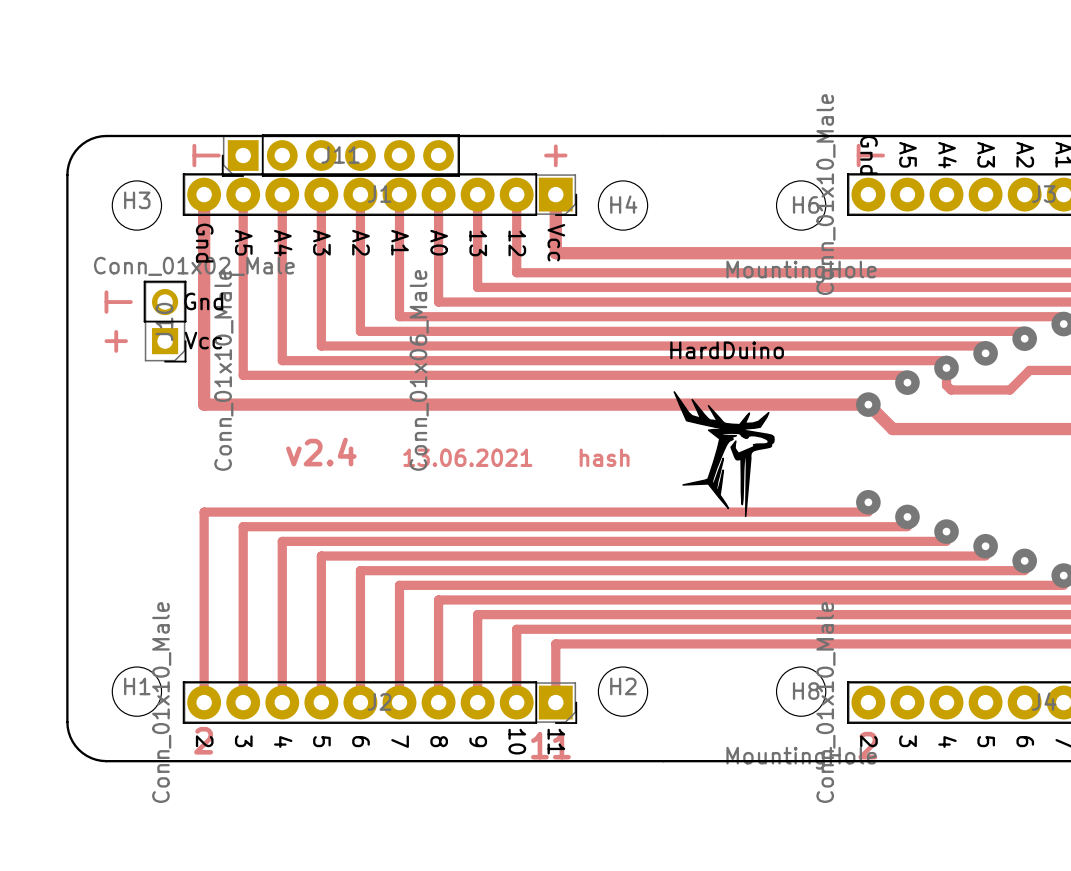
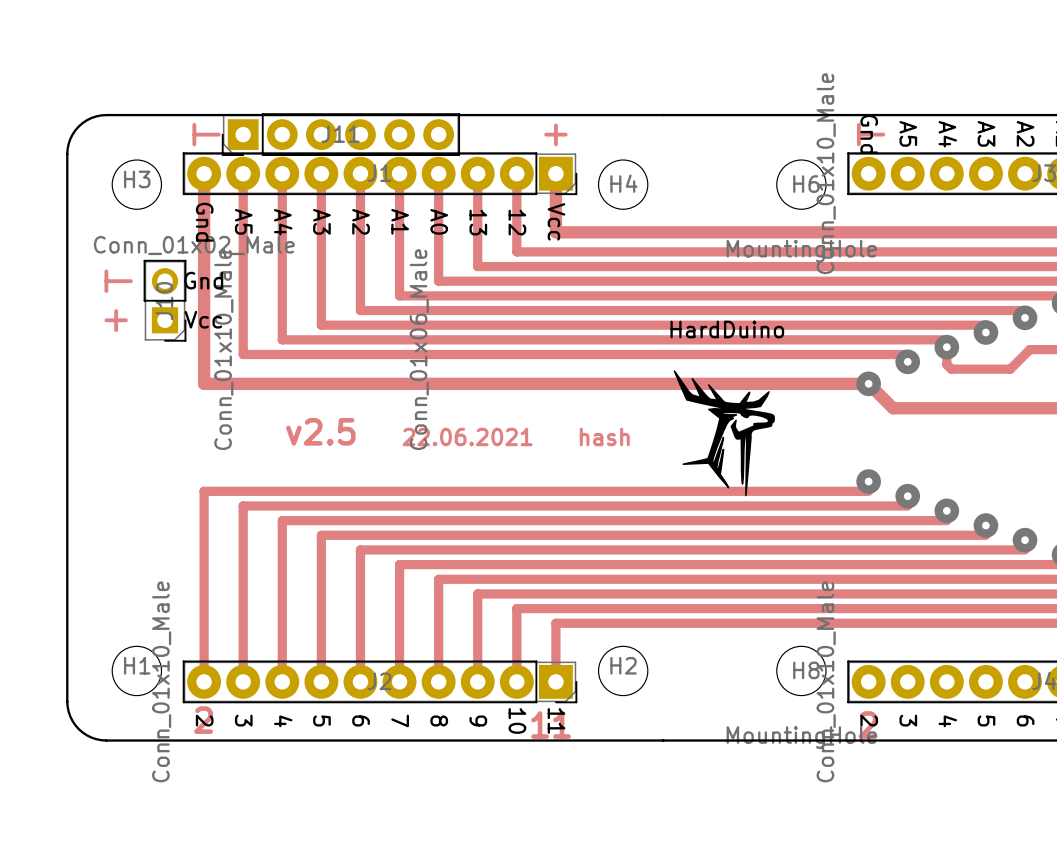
text: v2.4 (321, 452) -> v2.5 (320, 431)
text: 13.06.2021 (467, 457) -> 22.06.2021 (467, 436)

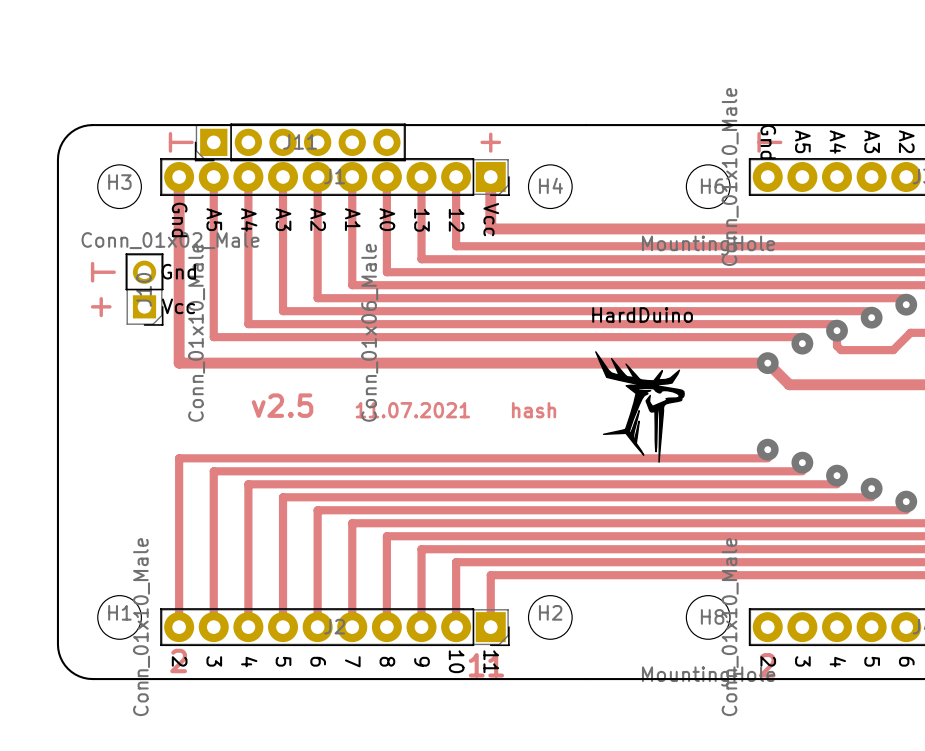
text: 22.06.2021 (467, 436) -> 11.07.2021 (412, 410)

